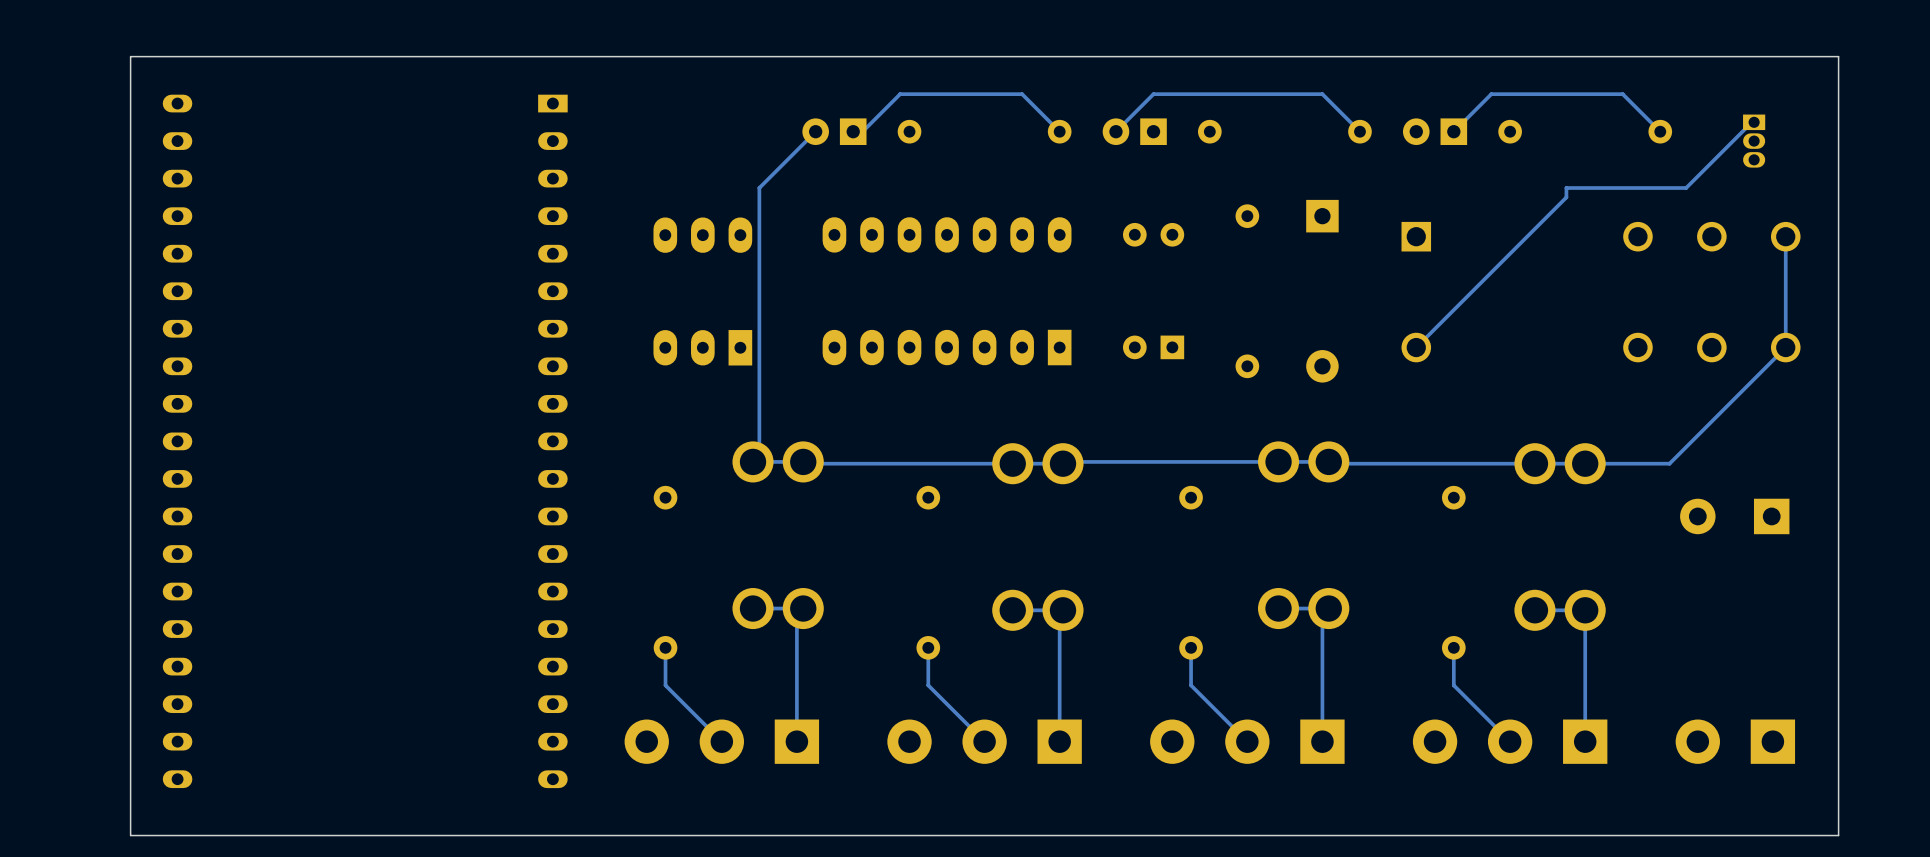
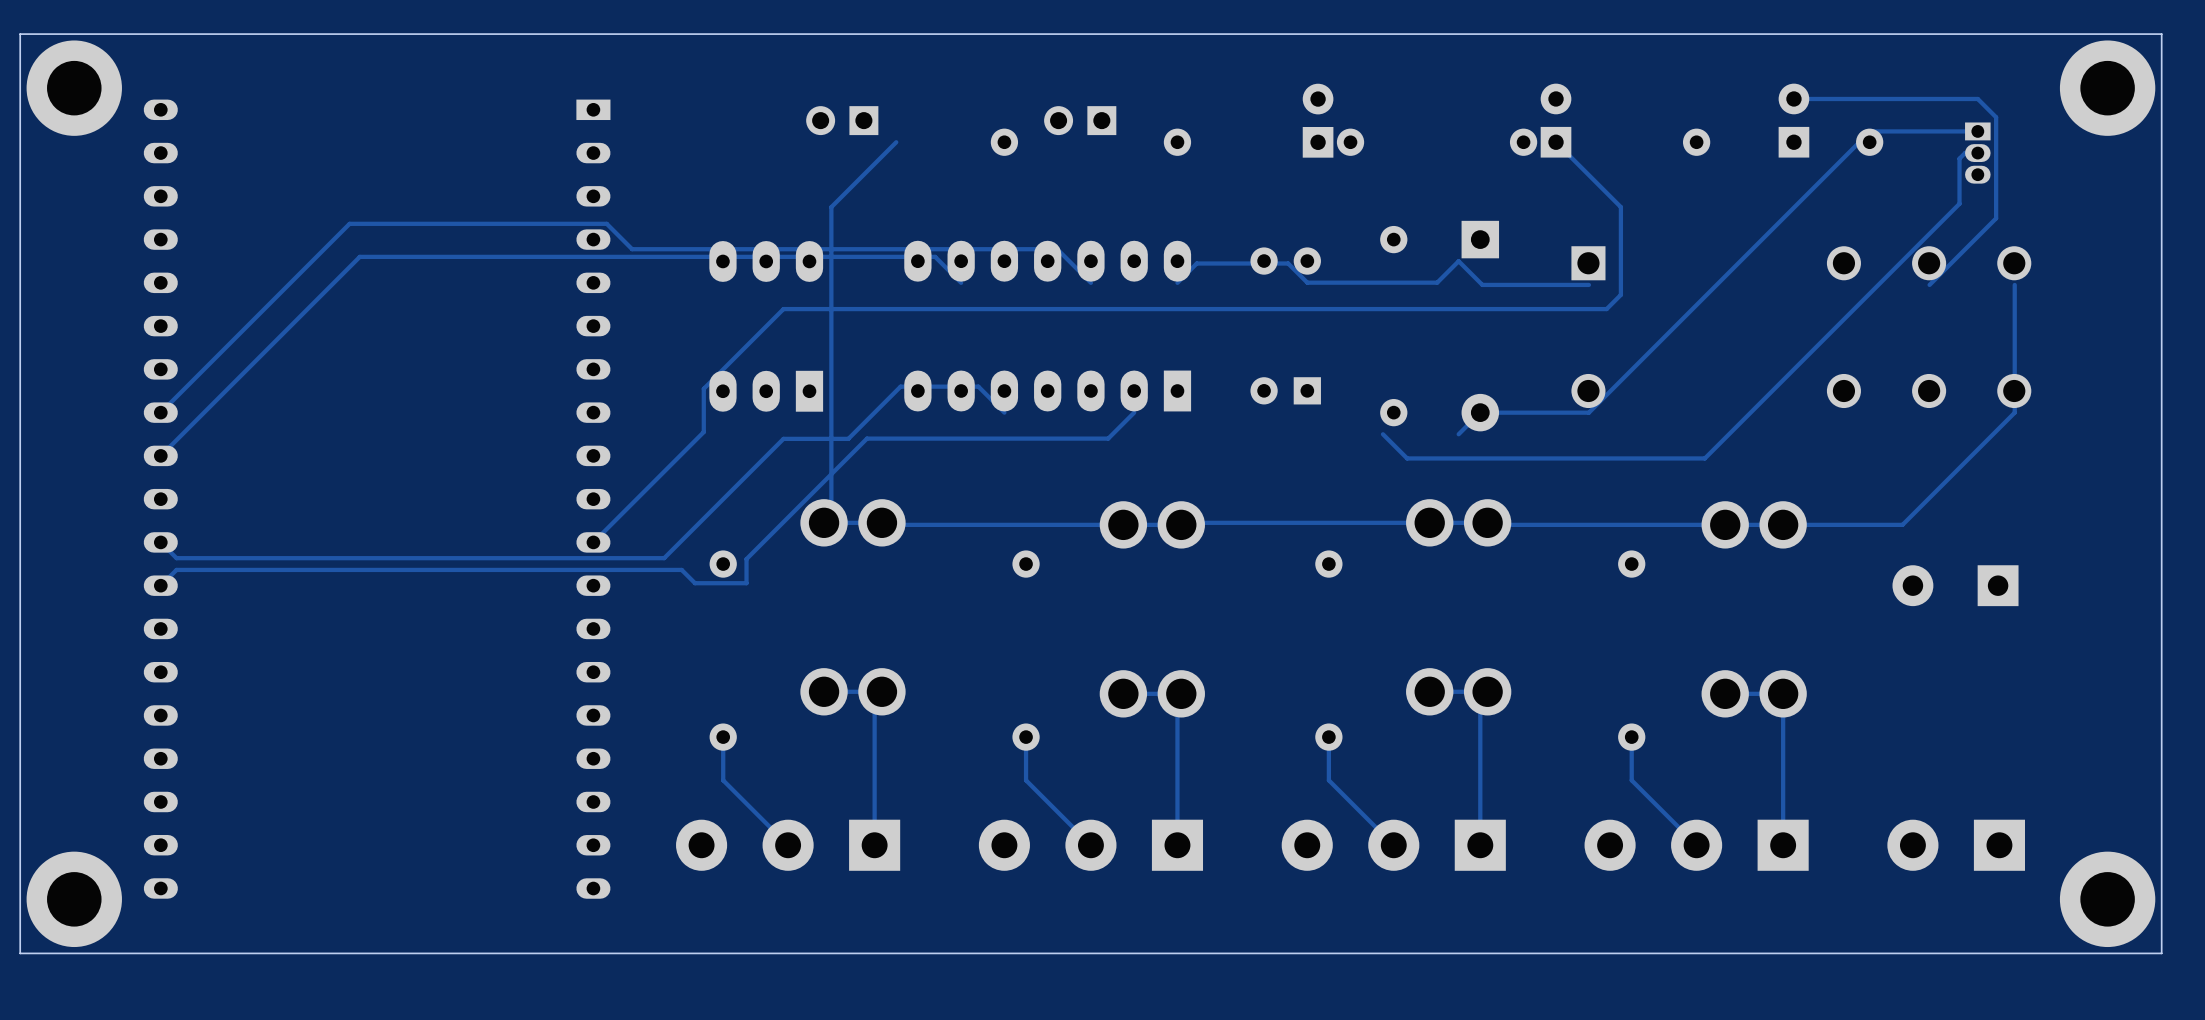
part: none -> (74, 88)
part: none -> (2107, 88)
track: (1594, 94) (1491, 94) (1453, 131) -> none
track: (1622, 94) (1660, 131) -> (1826, 98) (1977, 98) (1996, 117) (1996, 218) (1929, 284)
part: none -> (842, 120)
part: none -> (1080, 120)
part: none -> (1793, 120)
track: (1751, 122) (1686, 188) (1566, 188) (1566, 197) (1416, 347) -> (1975, 131) (1870, 131) (1588, 412) (1480, 412) (1458, 434)
part: (834, 131) -> none
track: (1059, 131) (1022, 94) (900, 94) (862, 131) (853, 131) -> none
part rotation: 0° (1134, 131) -> 90° clockwise (1318, 120)
part position: (1134, 131) -> (1318, 120)
track: (1359, 131) (1322, 94) (1153, 94) (1115, 131) -> none
track: none -> (1556, 142) (1620, 207) (1620, 294) (1606, 309) (783, 309) (703, 388) (703, 432) (593, 542)
part rotation: 0° (1435, 131) -> 90° clockwise (1556, 120)
part position: (1435, 131) -> (1556, 120)
track: none -> (1977, 153) (1965, 153) (1959, 158) (1959, 203) (1704, 458) (1407, 458) (1382, 434)
track: (1785, 236) (1785, 347) (1669, 463) -> (2014, 284) (2014, 412) (1902, 524) (1880, 524)
track: none -> (961, 282) (935, 256) (359, 256) (160, 455)
track: none -> (1090, 282) (1057, 249) (632, 249) (606, 223) (349, 223) (160, 412)
track: none -> (1177, 282) (1196, 263) (1288, 263) (1307, 282) (1437, 282) (1458, 261) (1482, 284) (1588, 284)
track: none -> (1004, 412) (978, 386) (900, 386) (848, 438) (783, 438) (664, 558) (176, 558) (160, 542)
track: none -> (1134, 412) (1108, 438) (866, 438) (746, 559) (746, 583) (695, 583) (681, 569) (176, 569) (160, 585)
part: none -> (74, 899)
part: none -> (2107, 899)
board edge: (1838, 835) (1838, 56) (130, 56) (130, 835) -> (2075, 953) (2161, 953) (2161, 34) (20, 34) (20, 953) (106, 953)

